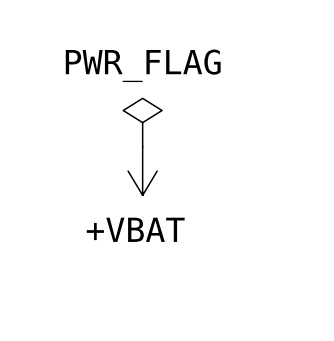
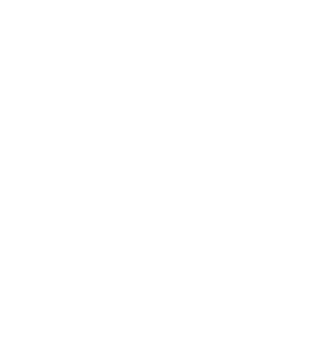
power symbol: PWR_FLAG (142, 122) -> none
power symbol: +VBAT (142, 171) -> none

